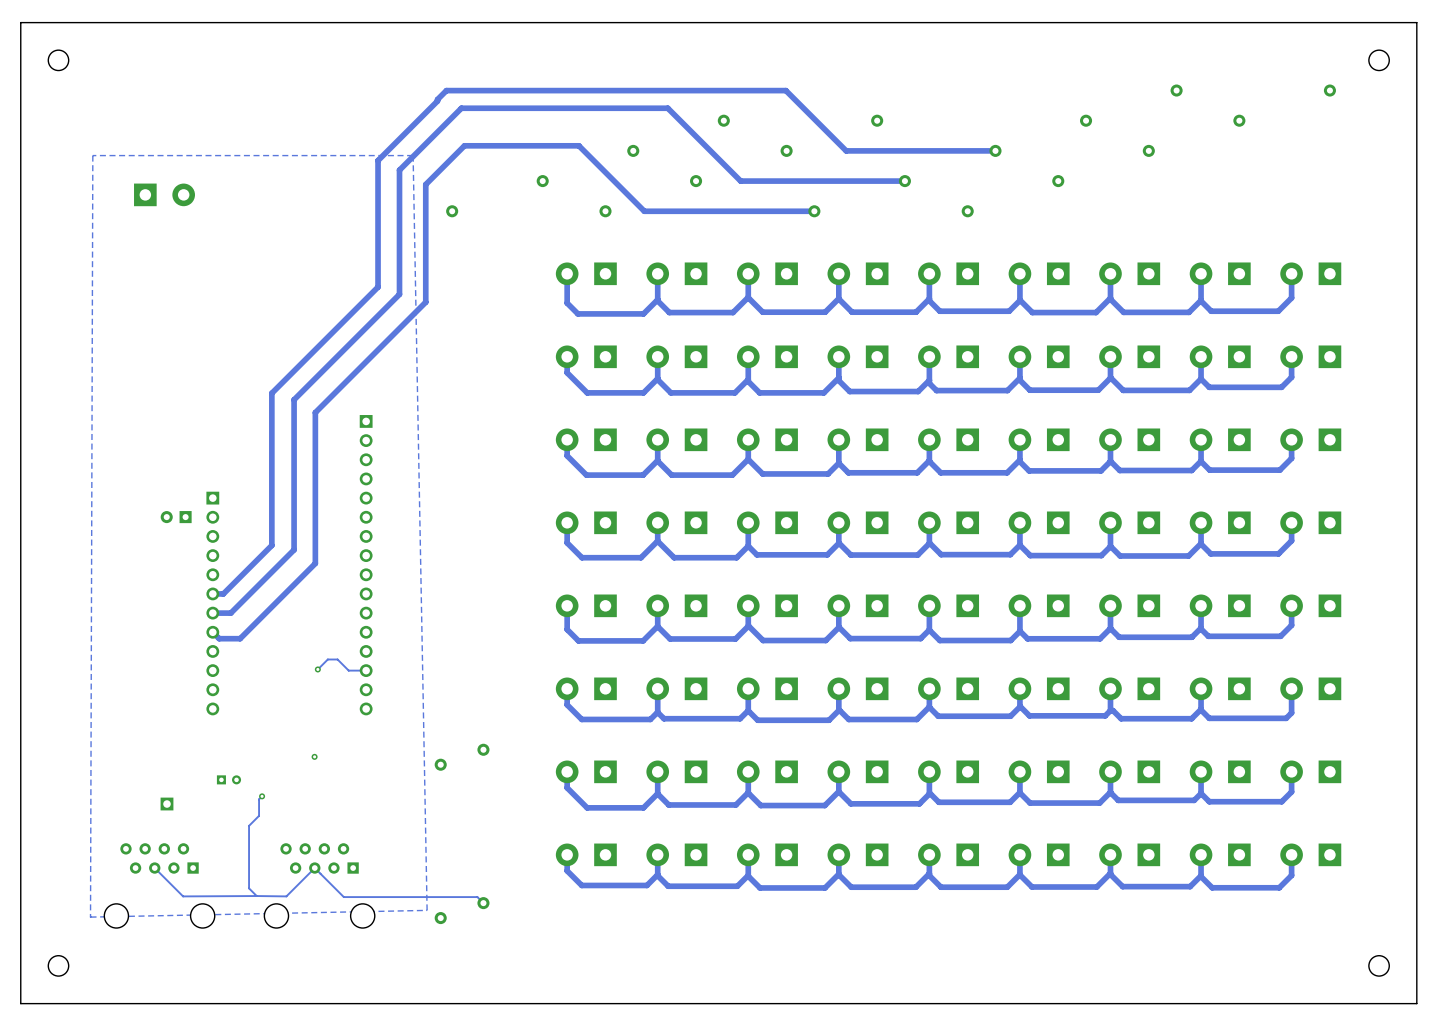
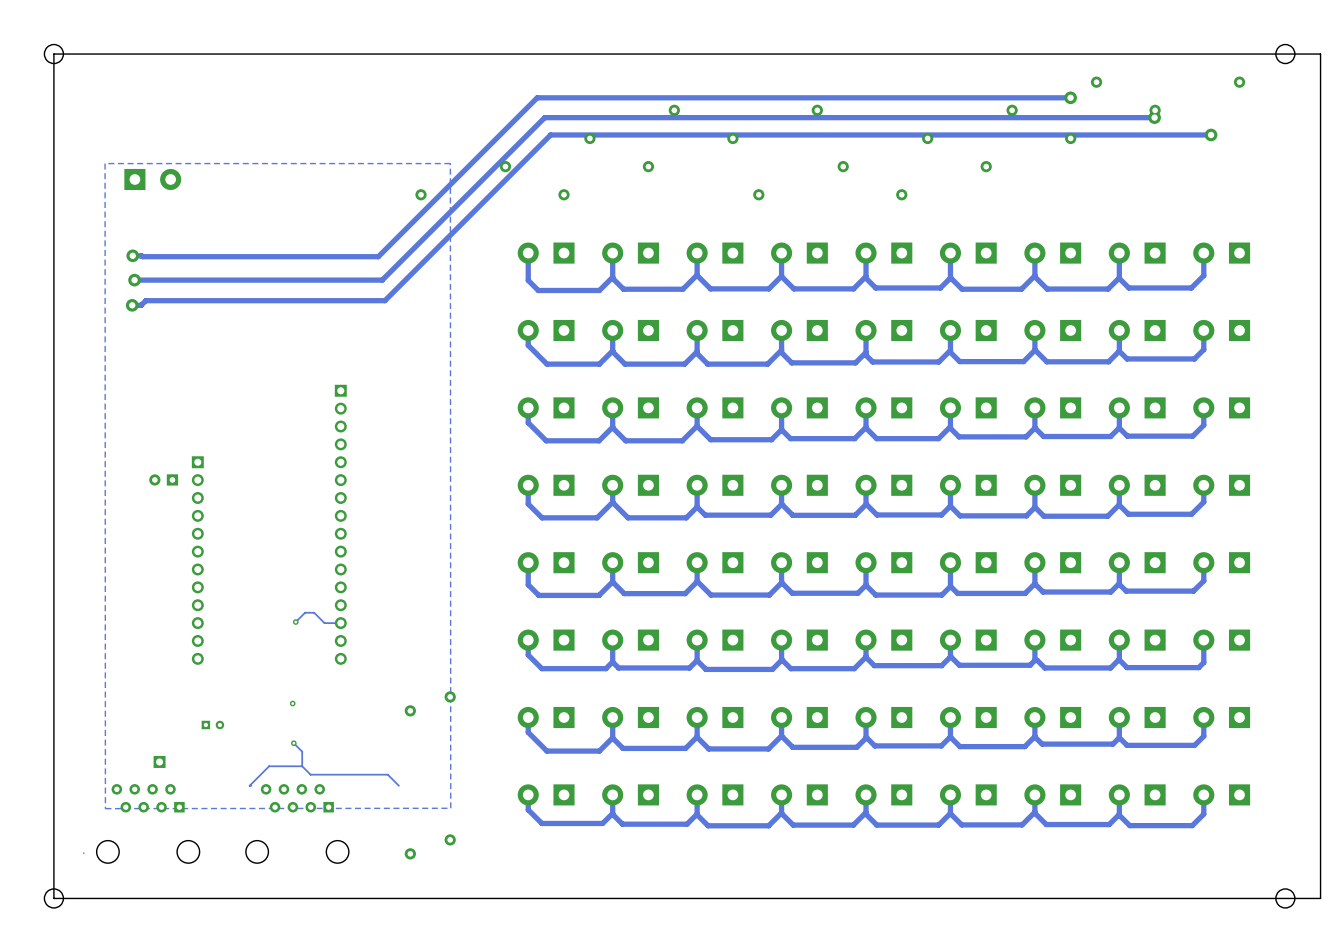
board edge: (1416, 60) (1416, 22) (20, 22) (20, 1003) (1416, 1003) (1416, 965) -> (1320, 54) (53, 54) (53, 898) (1320, 898)
track: none -> (1070, 97) (537, 97) (378, 256) (132, 255)
via: none -> (1070, 97)
track: none -> (1154, 117) (544, 117) (382, 280) (134, 280)
via: none -> (1154, 117)
track: none -> (1211, 134) (550, 134) (384, 300) (145, 300) (141, 305) (132, 305)
via: none -> (1211, 134)
track: (995, 150) (846, 150) (785, 90) (446, 90) (378, 160) (378, 287) (271, 393) (271, 545) (223, 593) (212, 593) -> none
zone outline: (413, 155) (427, 910) (90, 917) (92, 155) (413, 155) -> (450, 163) (450, 808) (105, 808) (105, 163) (450, 163)
track: (904, 181) (740, 181) (667, 108) (461, 108) (399, 170) (399, 294) (294, 399) (294, 549) (230, 613) (212, 613) -> none
track: (814, 211) (644, 211) (578, 145) (464, 145) (425, 184) (425, 302) (315, 412) (315, 563) (240, 638) (219, 638) (212, 632) -> none
via: none -> (132, 255)
via: none -> (134, 280)
via: none -> (132, 305)
track: (262, 796) (259, 799) (259, 815) (249, 825) (249, 888) (256, 896) -> none
via: (262, 796) -> none
track: none -> (293, 743) (302, 751) (302, 766)
via: none -> (293, 743)
part position: (167, 804) -> (159, 761)
track: none -> (302, 766) (310, 774) (387, 774) (398, 785)
track: none -> (302, 766) (269, 766) (249, 785) (251, 785)
track: (154, 868) (183, 896) (256, 896) -> none
track: (256, 896) (286, 896) (314, 868) (343, 897) (477, 897) (483, 903) -> none

